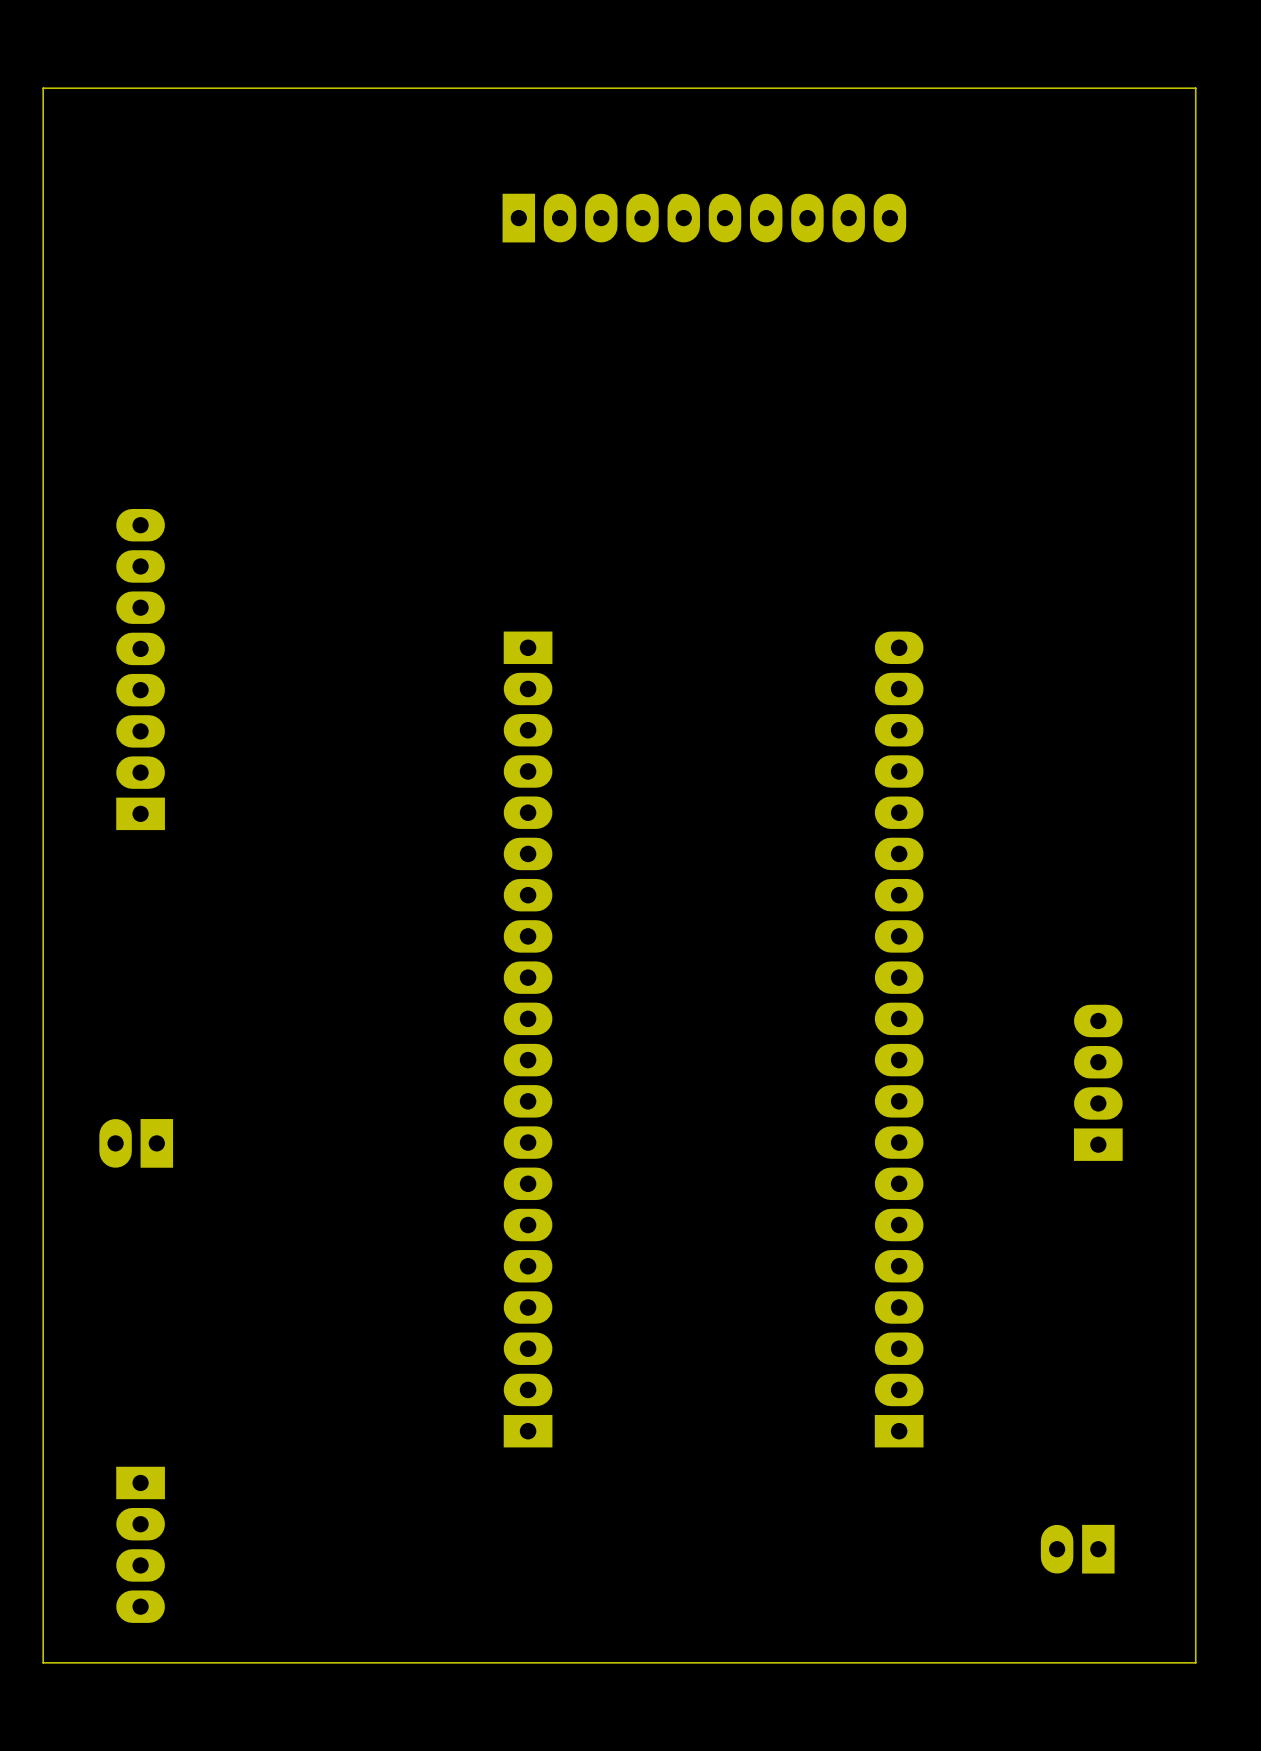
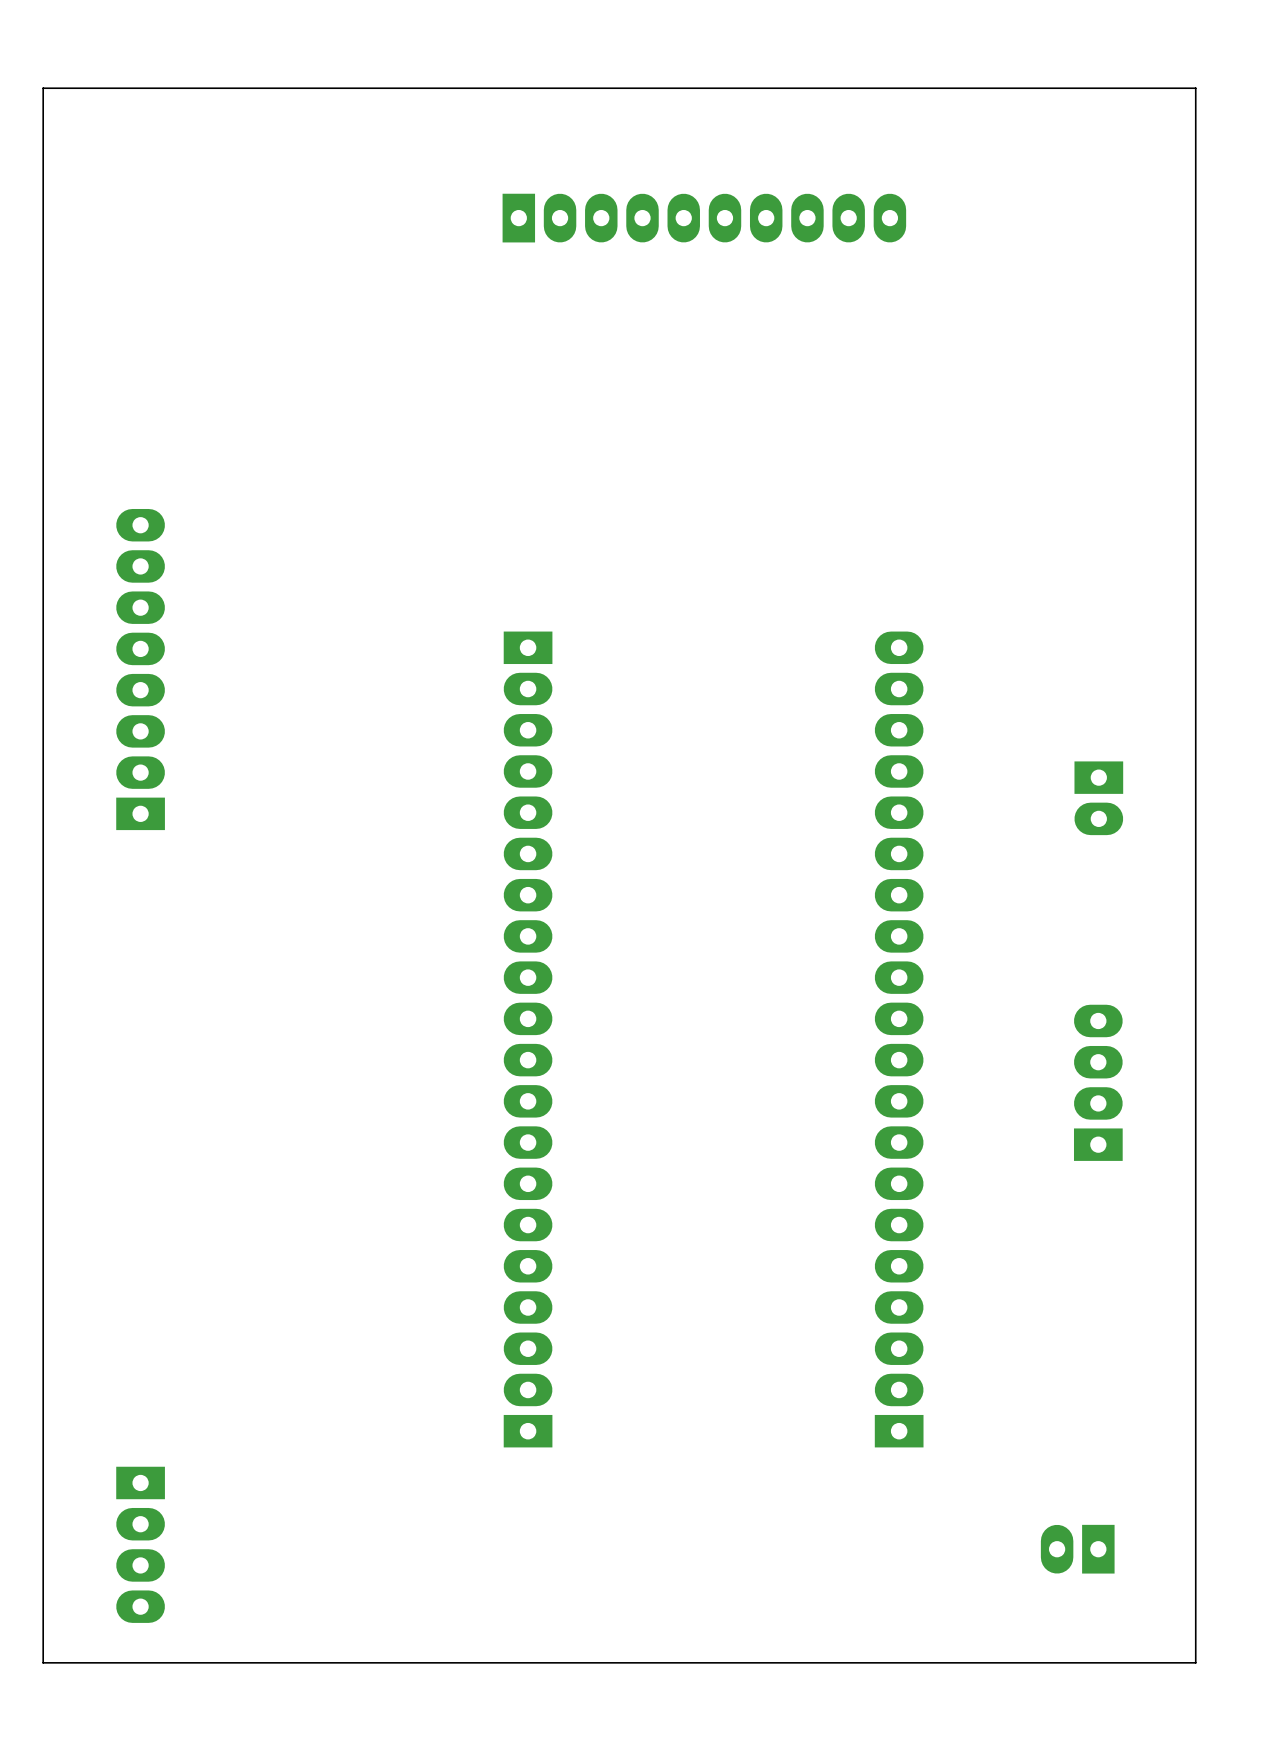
part: none -> (1098, 798)
part: (136, 1143) -> none

